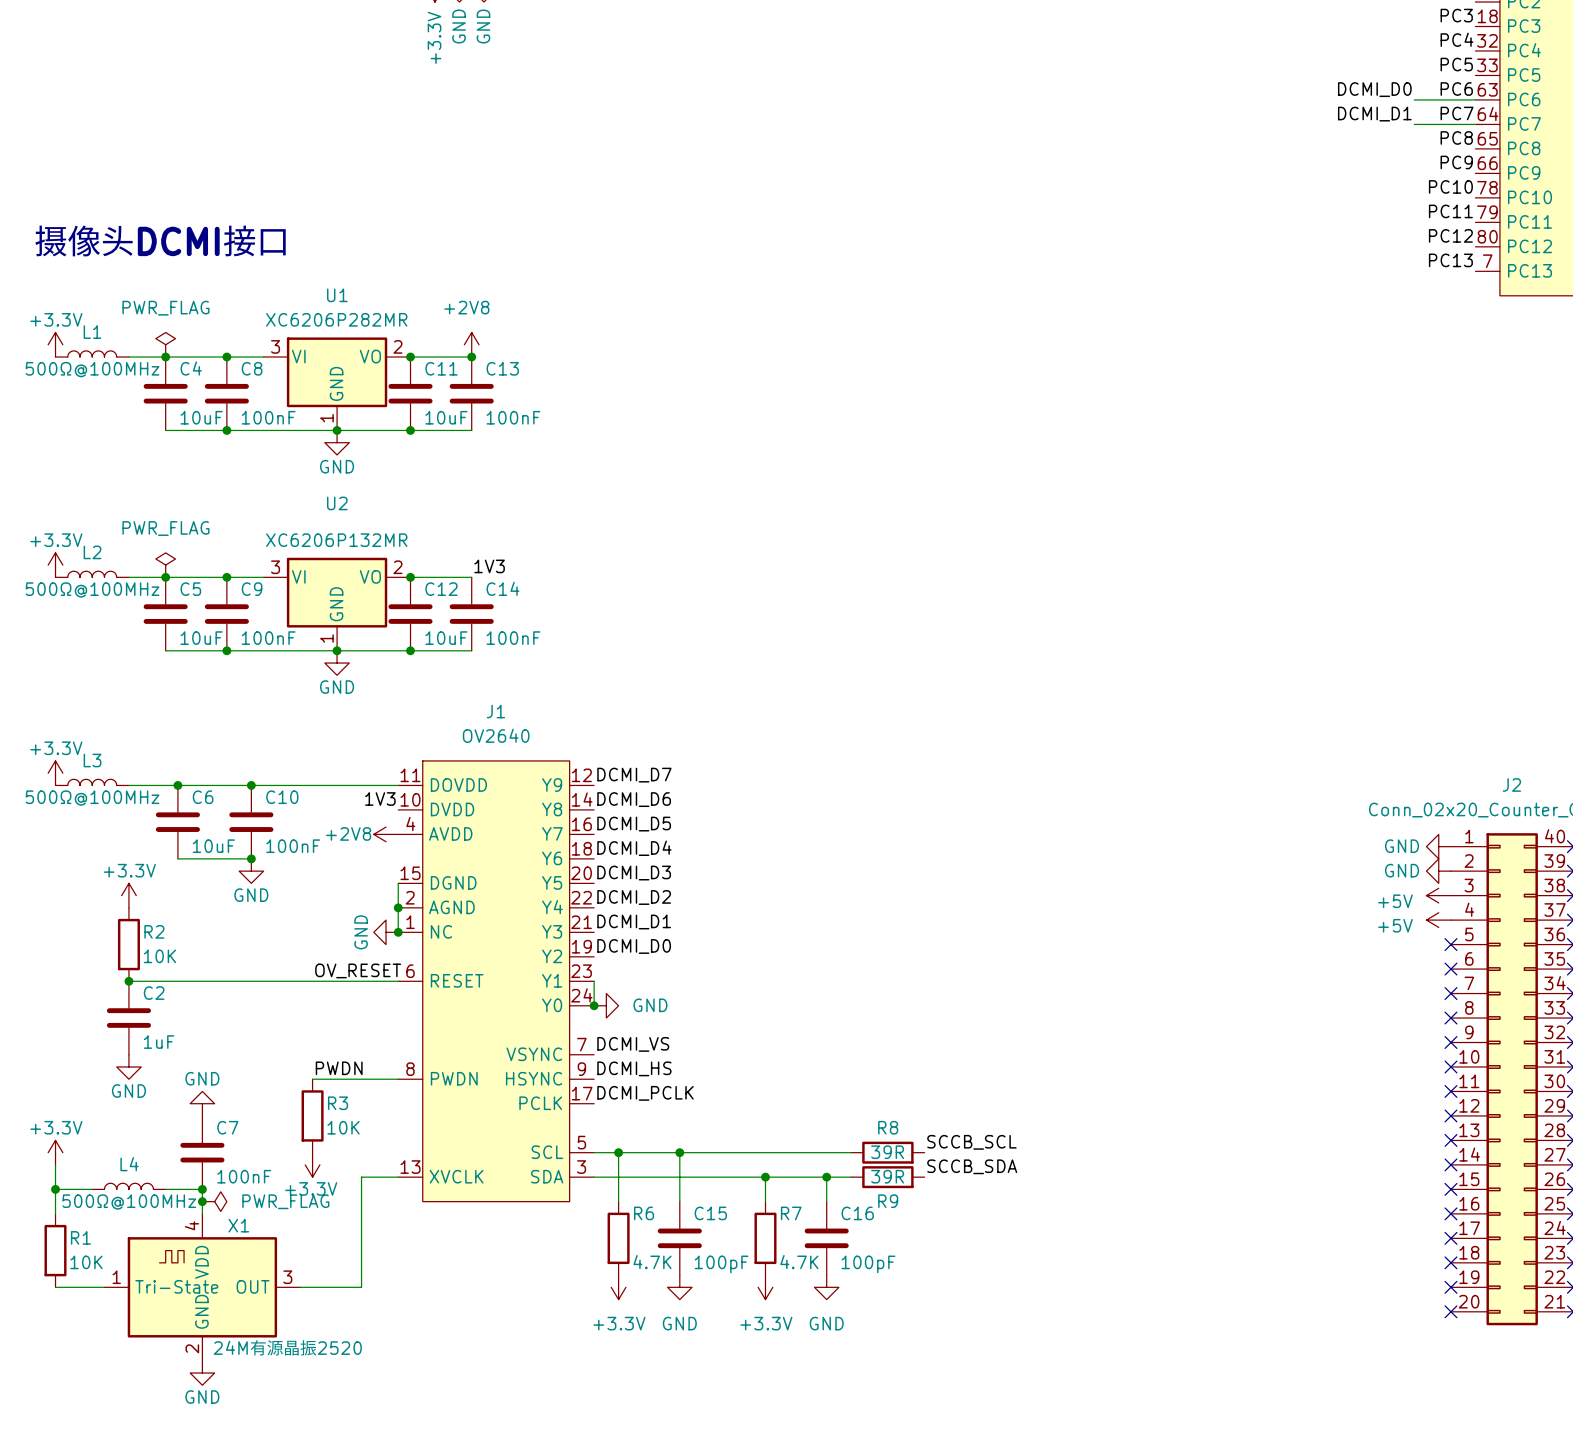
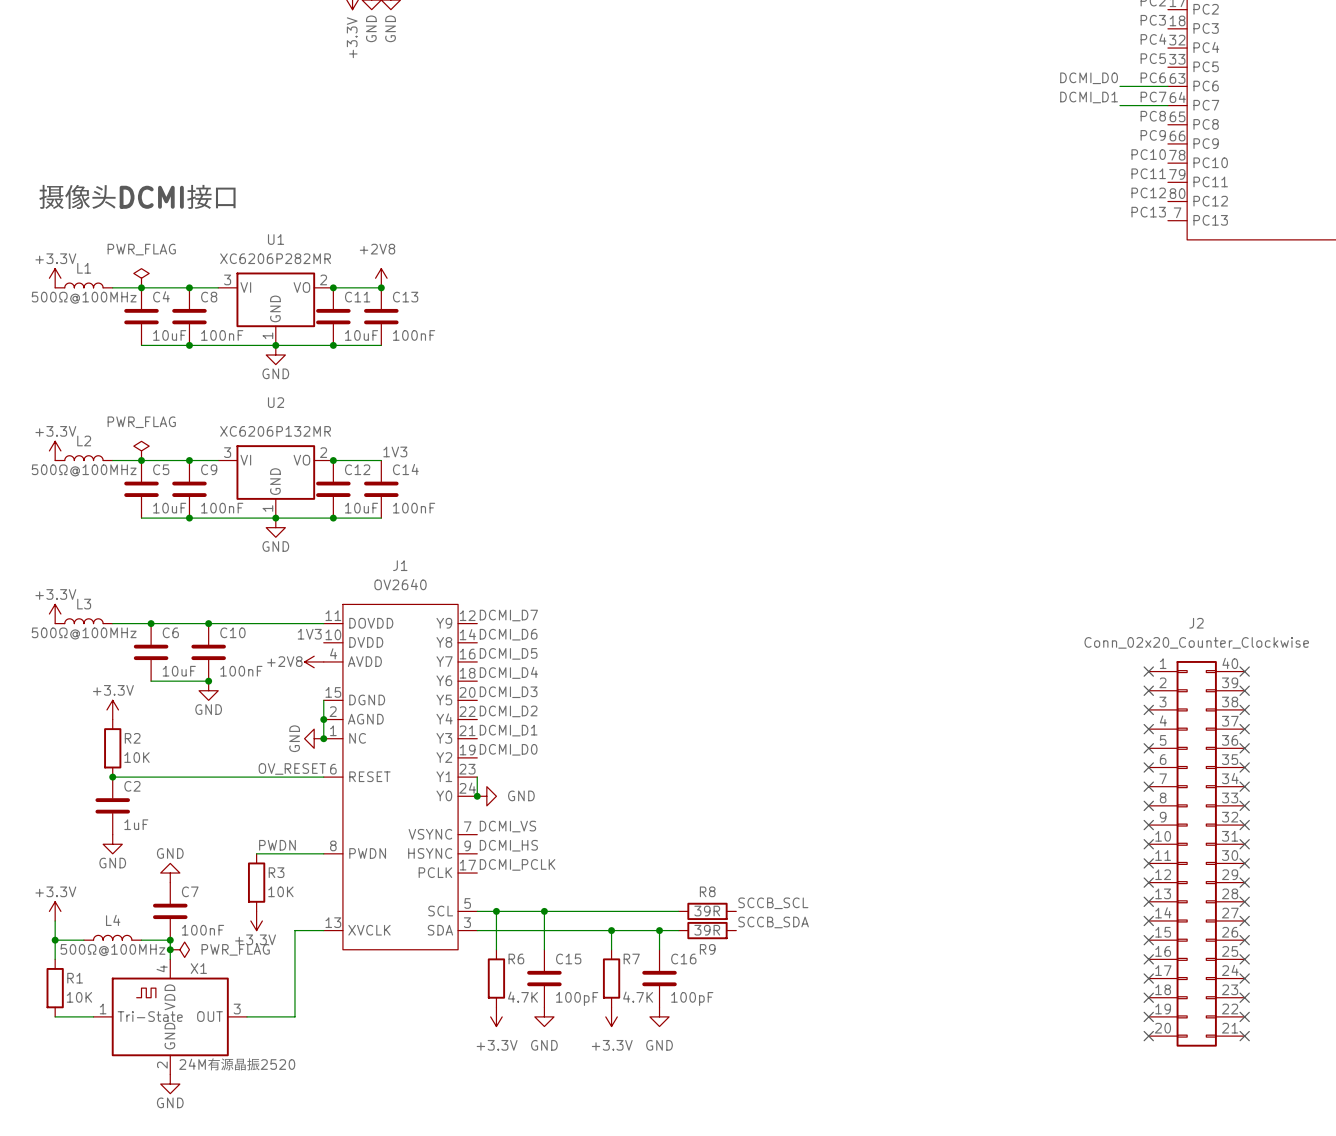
power symbol: GND (1438, 846) -> none
no-connect mark: none -> (1148, 671)
power symbol: GND (1438, 871) -> none
no-connect mark: none -> (1148, 690)
power symbol: +5V (1438, 895) -> none
no-connect mark: none -> (1148, 709)
power symbol: +5V (1438, 920) -> none
no-connect mark: none -> (1148, 729)

